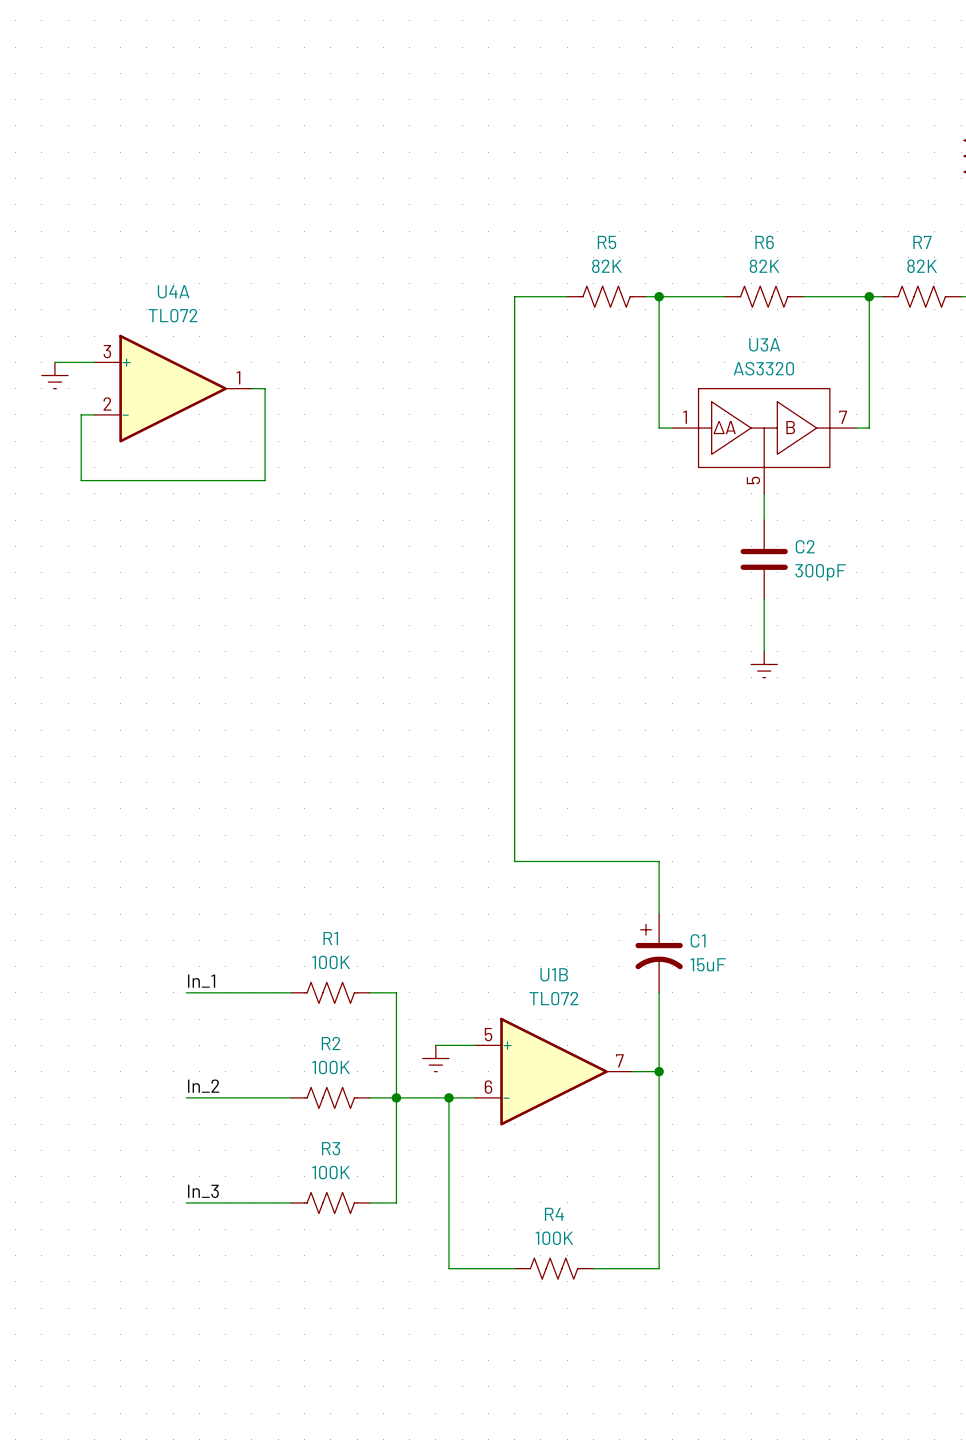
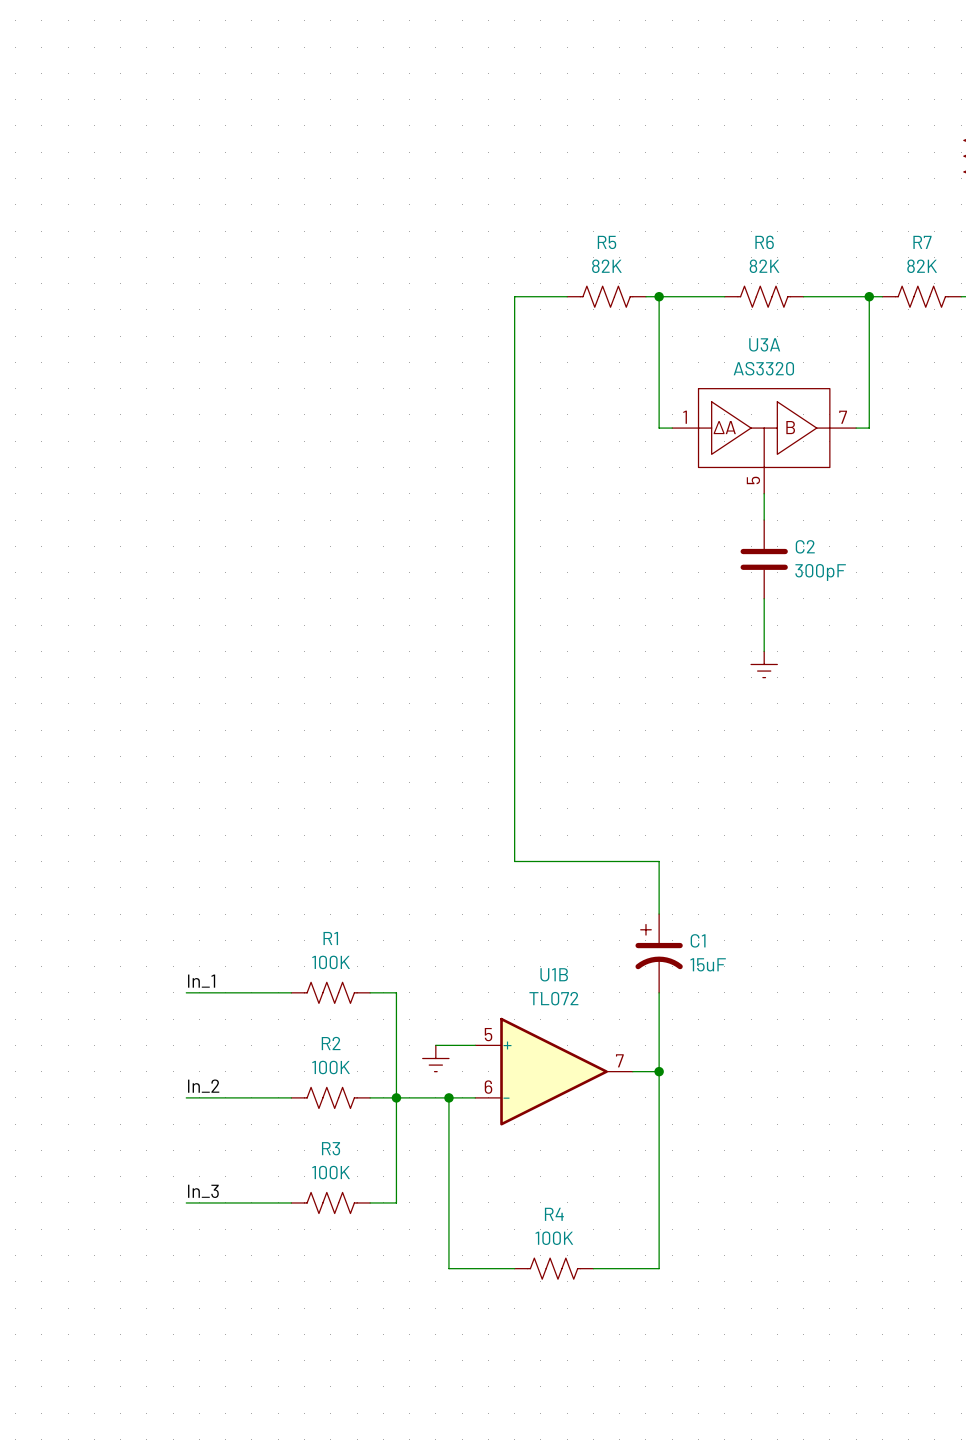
wire: (54, 362) (94, 362) -> none
power symbol: (54, 375) -> none
U4A: TL072 (173, 388) -> none
wire: (251, 388) (265, 388) (265, 480) (81, 480) (81, 414) (94, 414) -> none

